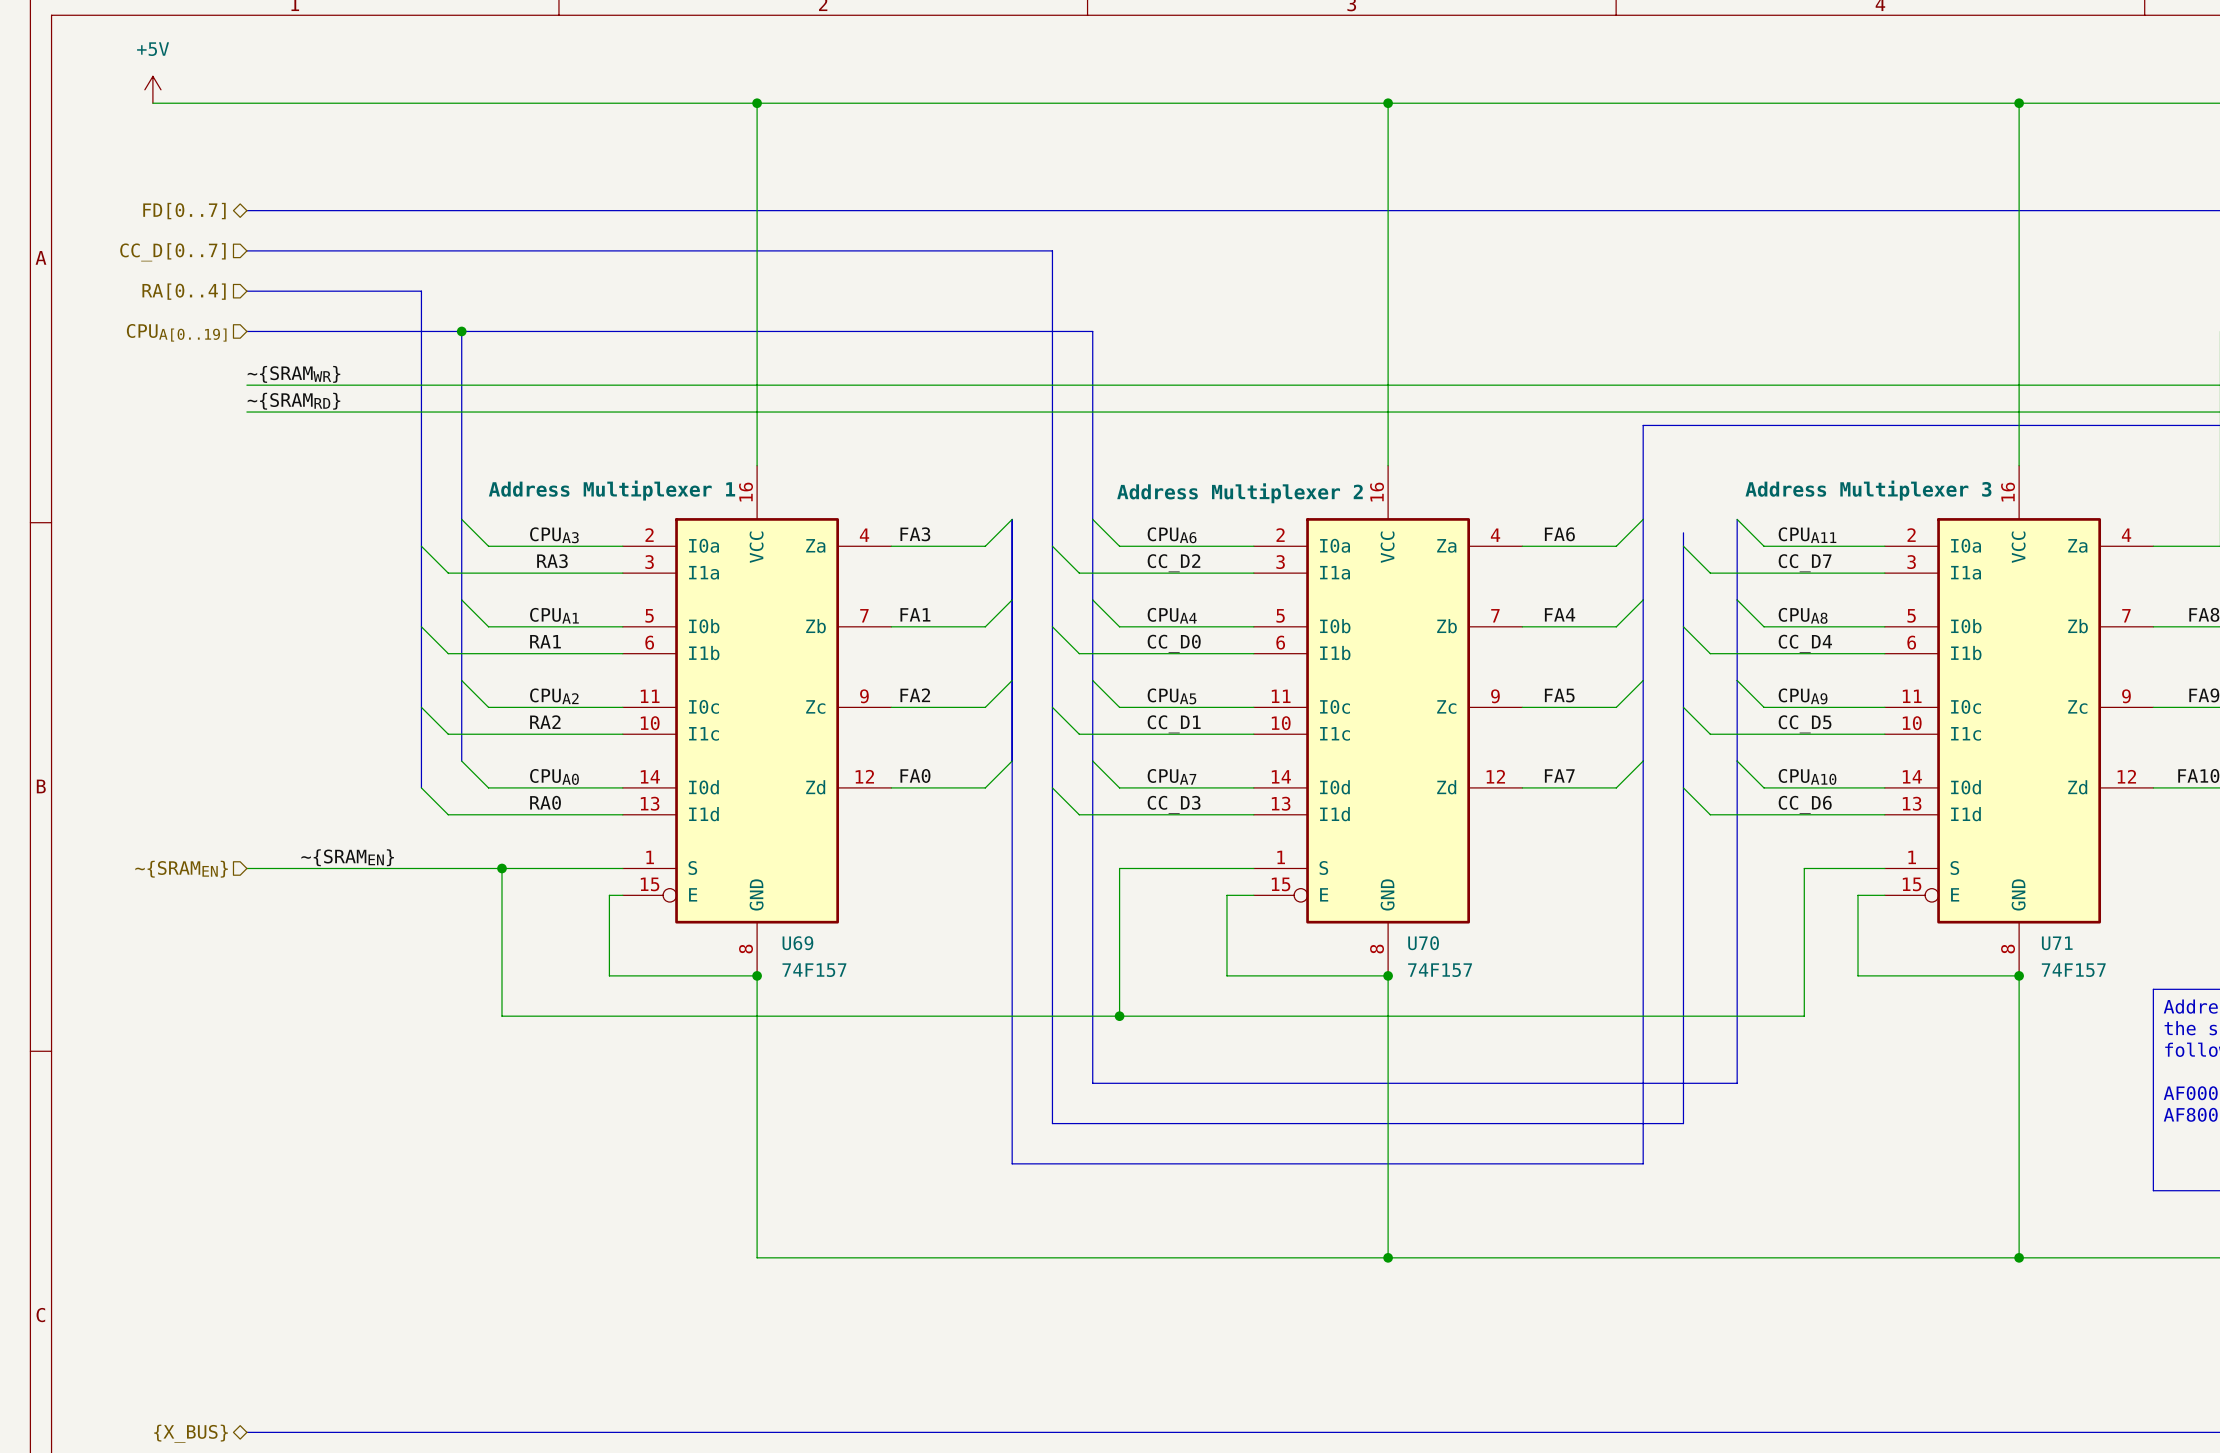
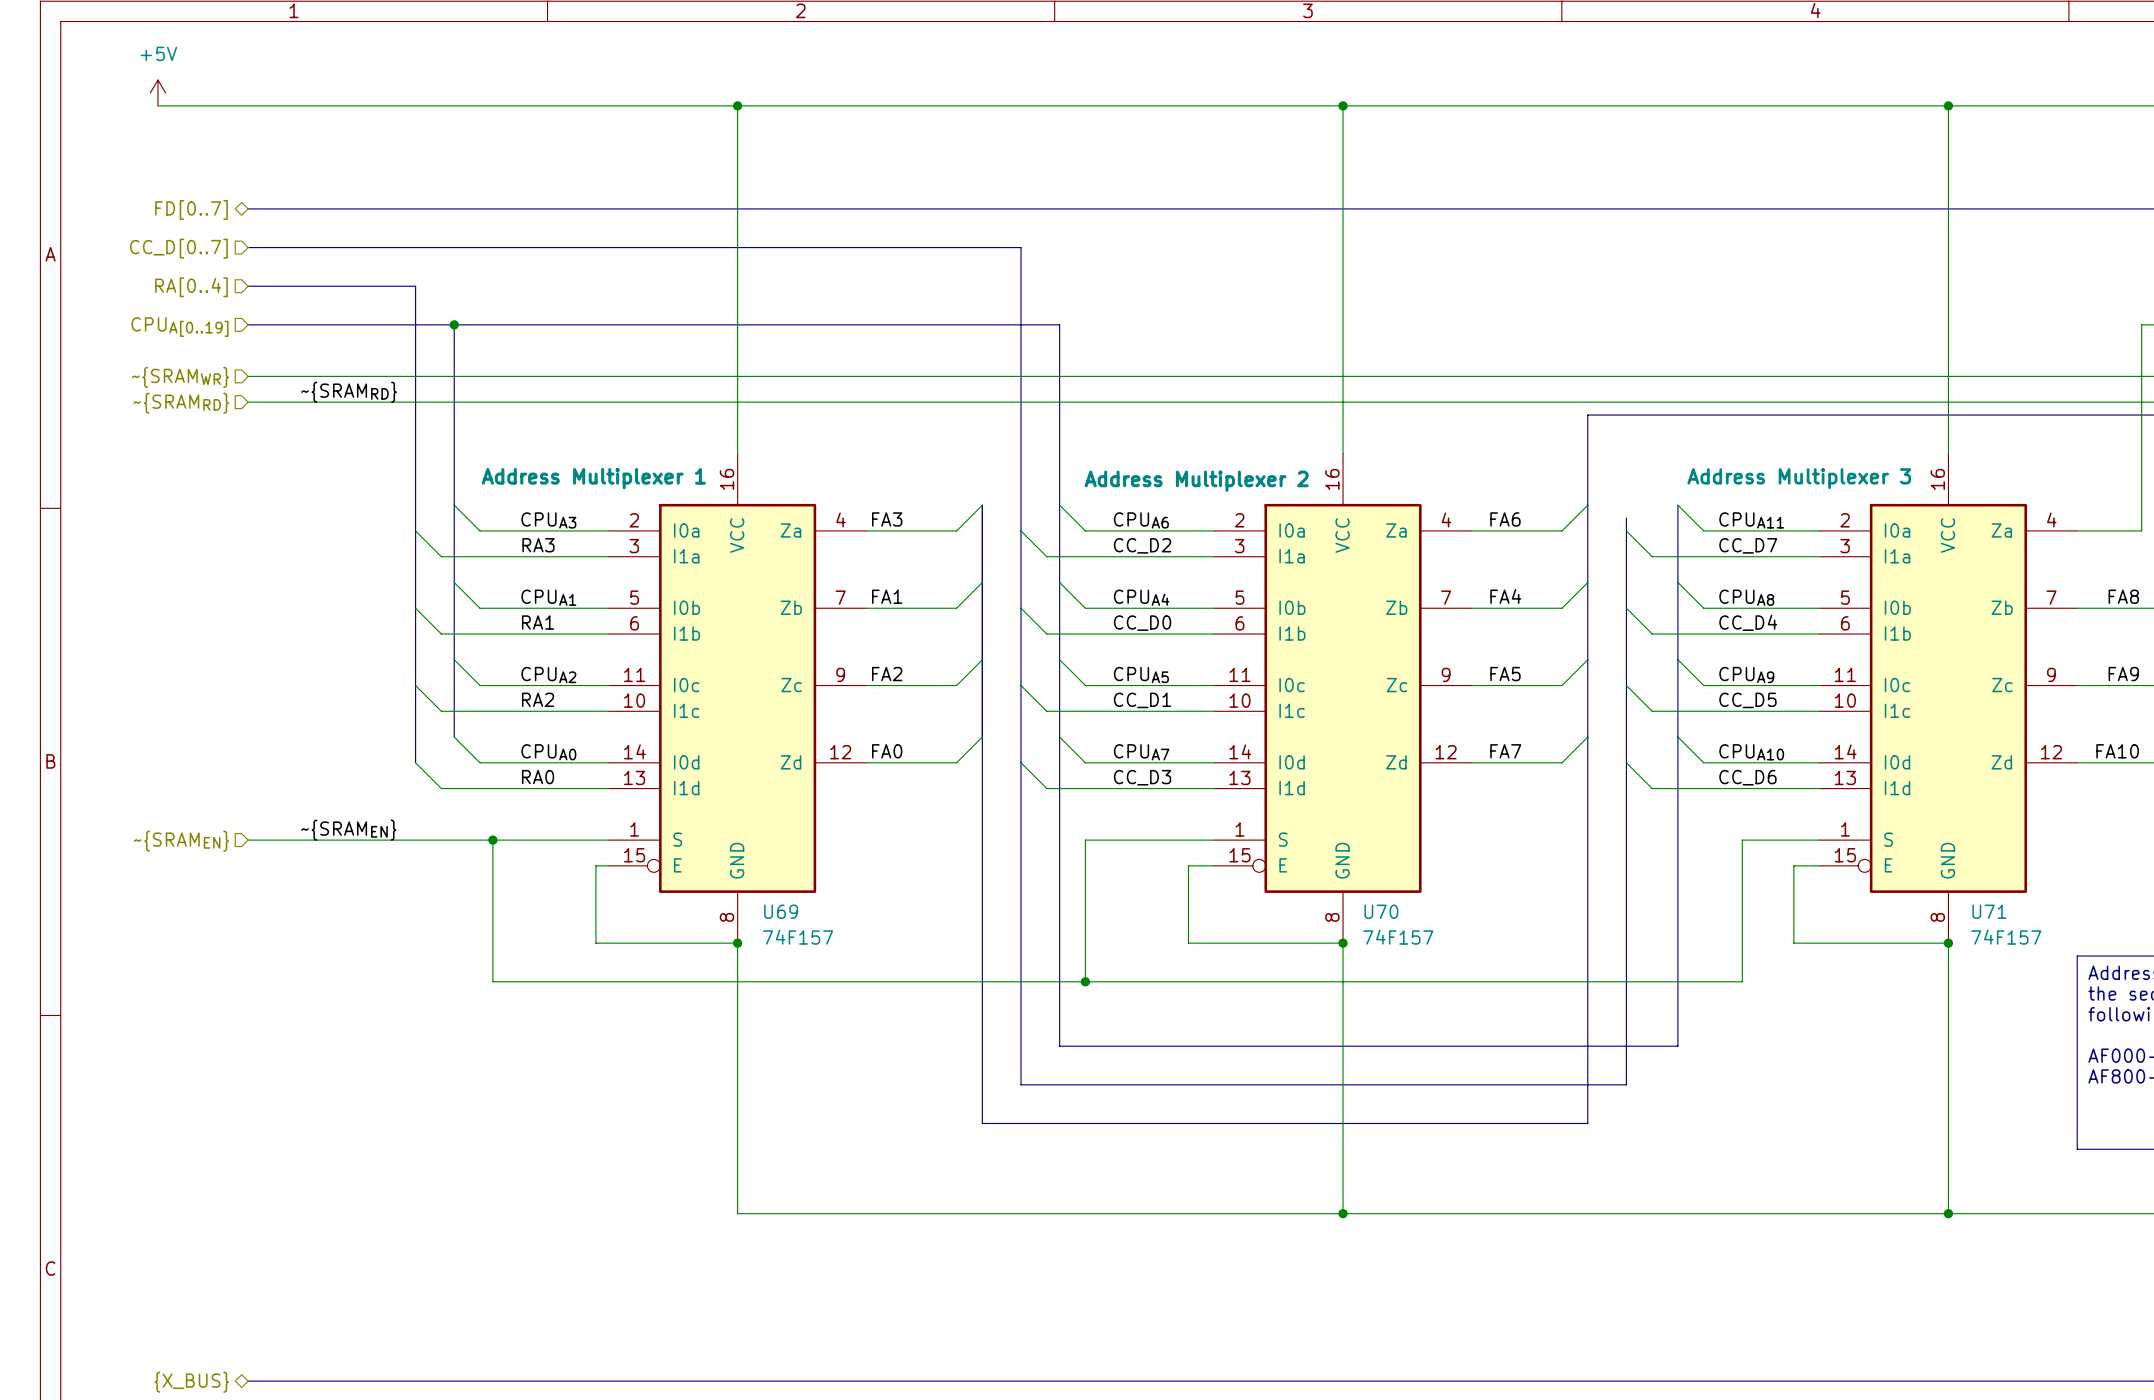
label: ~{SRAMWR} (293, 374) -> none
hierarchical label: none -> ~{SRAMWR} (180, 377)
label position: ~{SRAMRD} (293, 401) -> ~{SRAMRD} (349, 392)
hierarchical label: none -> ~{SRAMRD} (181, 403)

